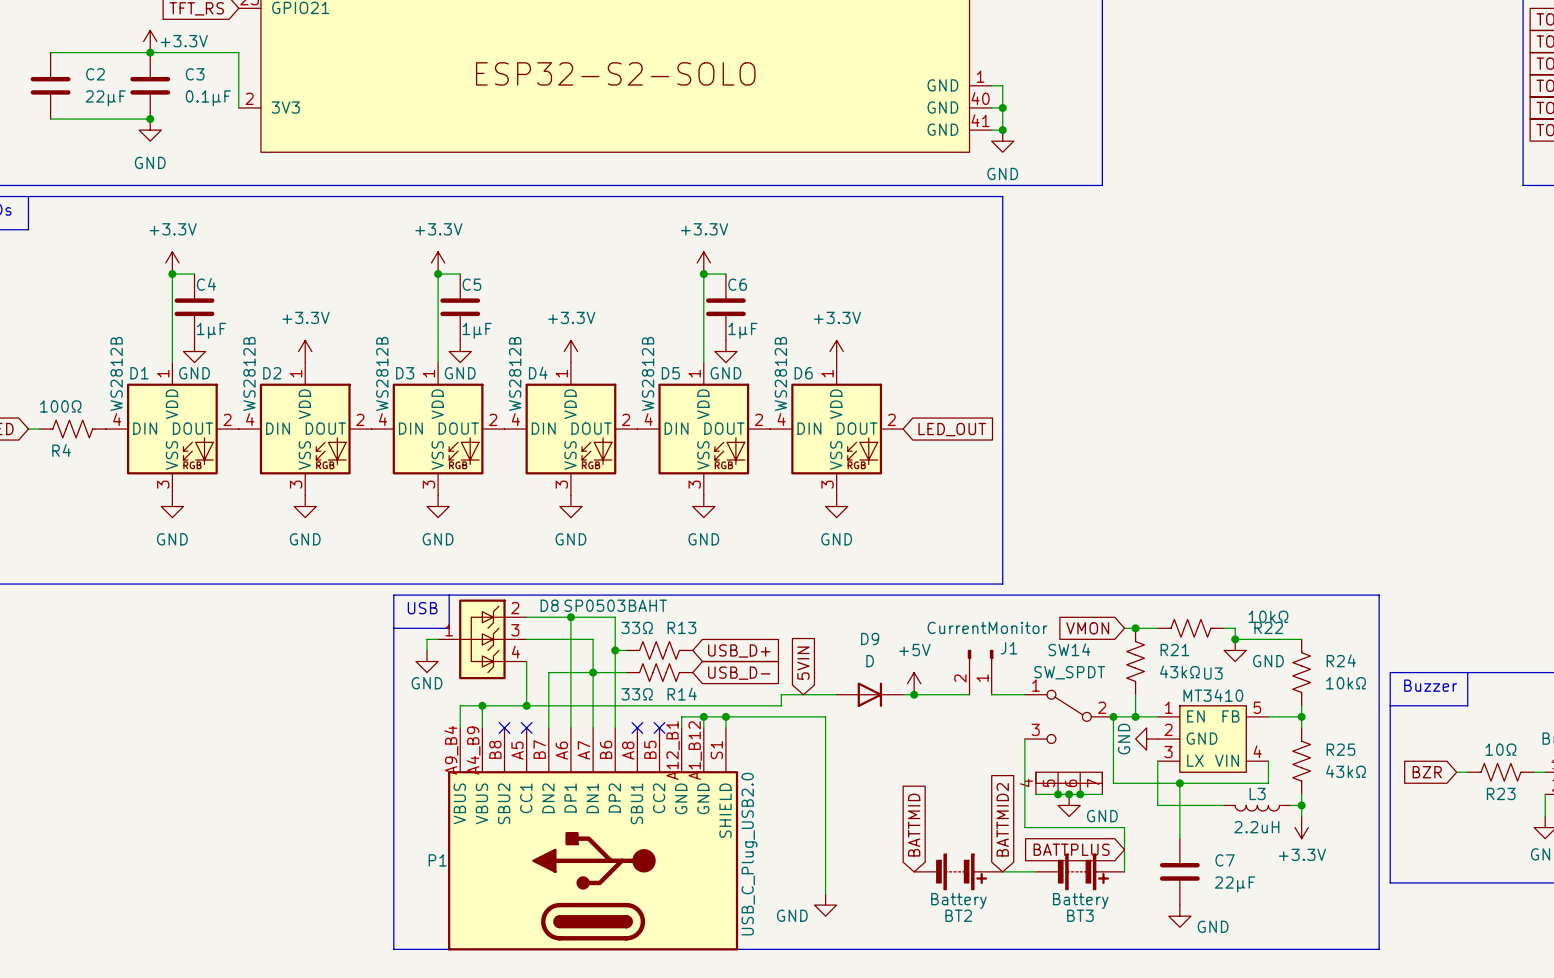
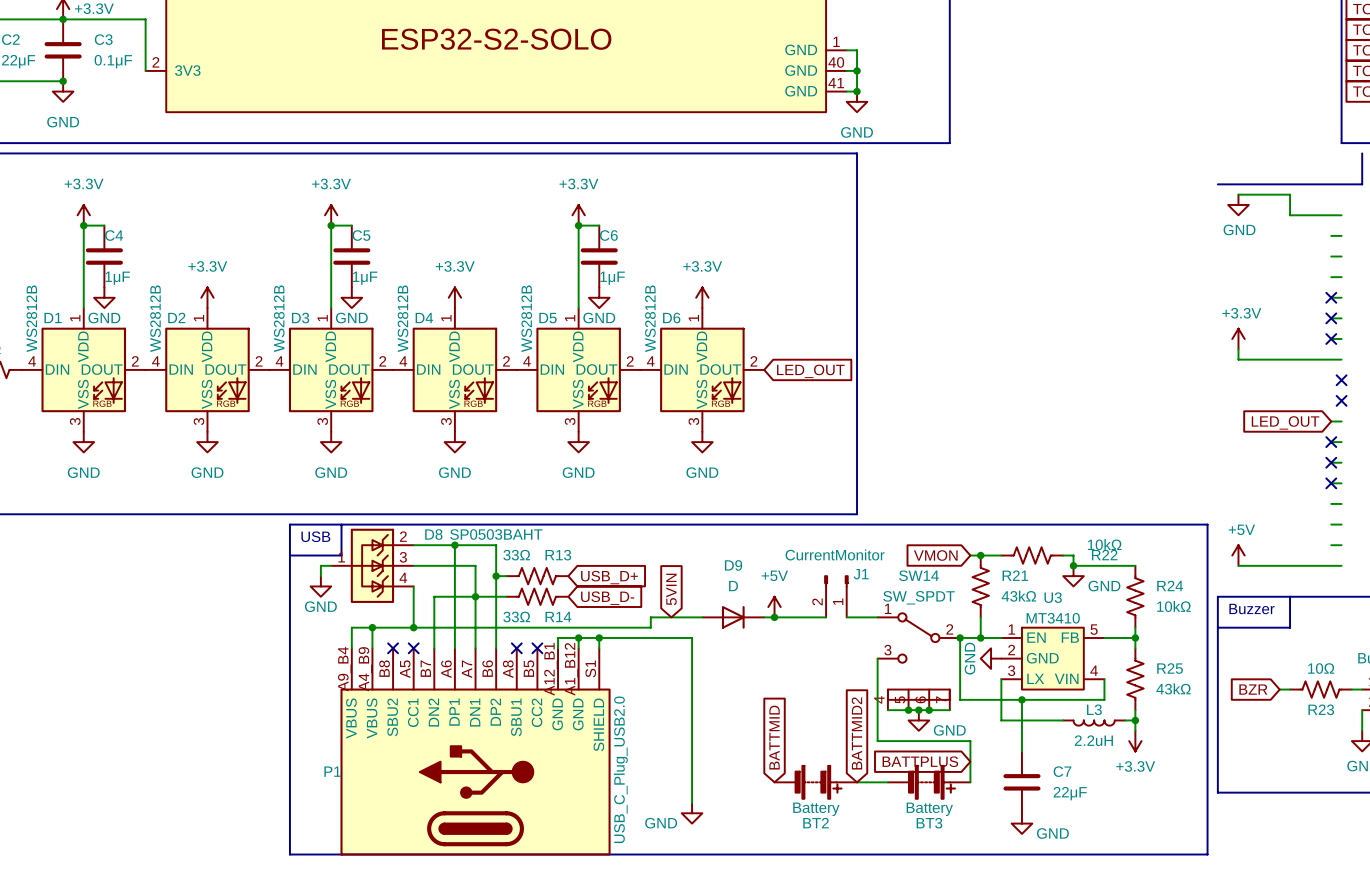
line: none -> (1362, 153) (1362, 184) (1217, 184)
wire: none -> (1238, 194) (1290, 194) (1290, 215) (1341, 215)
power symbol: none -> GND (1238, 204)
wire: none -> (1331, 235) (1341, 235)
wire: none -> (1331, 256) (1341, 256)
wire: none -> (1331, 277) (1341, 277)
wire: none -> (1331, 297) (1341, 297)
no-connect mark: none -> (1331, 297)
wire: none -> (1331, 318) (1341, 318)
no-connect mark: none -> (1331, 318)
power symbol: none -> +3.3V (1238, 339)
wire: none -> (1331, 339) (1341, 339)
no-connect mark: none -> (1331, 339)
wire: none -> (1238, 349) (1238, 359) (1341, 359)
no-connect mark: none -> (1341, 380)
no-connect mark: none -> (1341, 400)
global label: none -> LED_OUT (1285, 422)
wire: none -> (1331, 421) (1341, 421)
wire: none -> (1331, 442) (1341, 442)
no-connect mark: none -> (1331, 442)
wire: none -> (1331, 462) (1341, 462)
no-connect mark: none -> (1331, 462)
wire: none -> (1331, 483) (1341, 483)
no-connect mark: none -> (1331, 483)
wire: none -> (1331, 503) (1341, 503)
wire: none -> (1331, 524) (1341, 524)
wire: none -> (1331, 545) (1341, 545)
power symbol: none -> +5V (1238, 555)
wire: none -> (1238, 565) (1341, 565)

